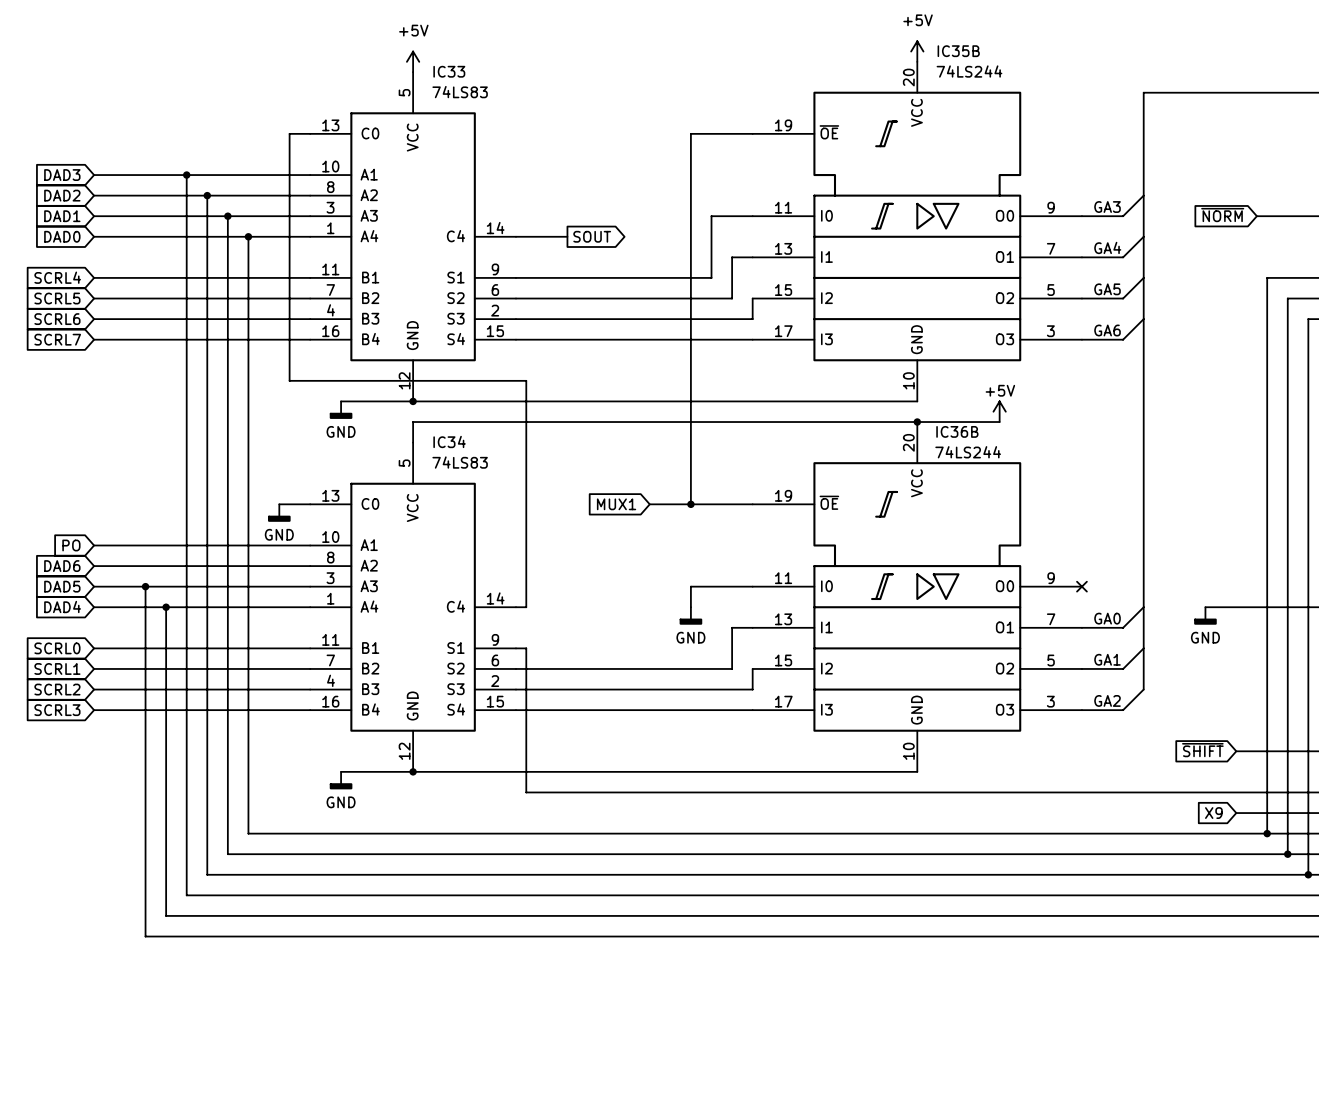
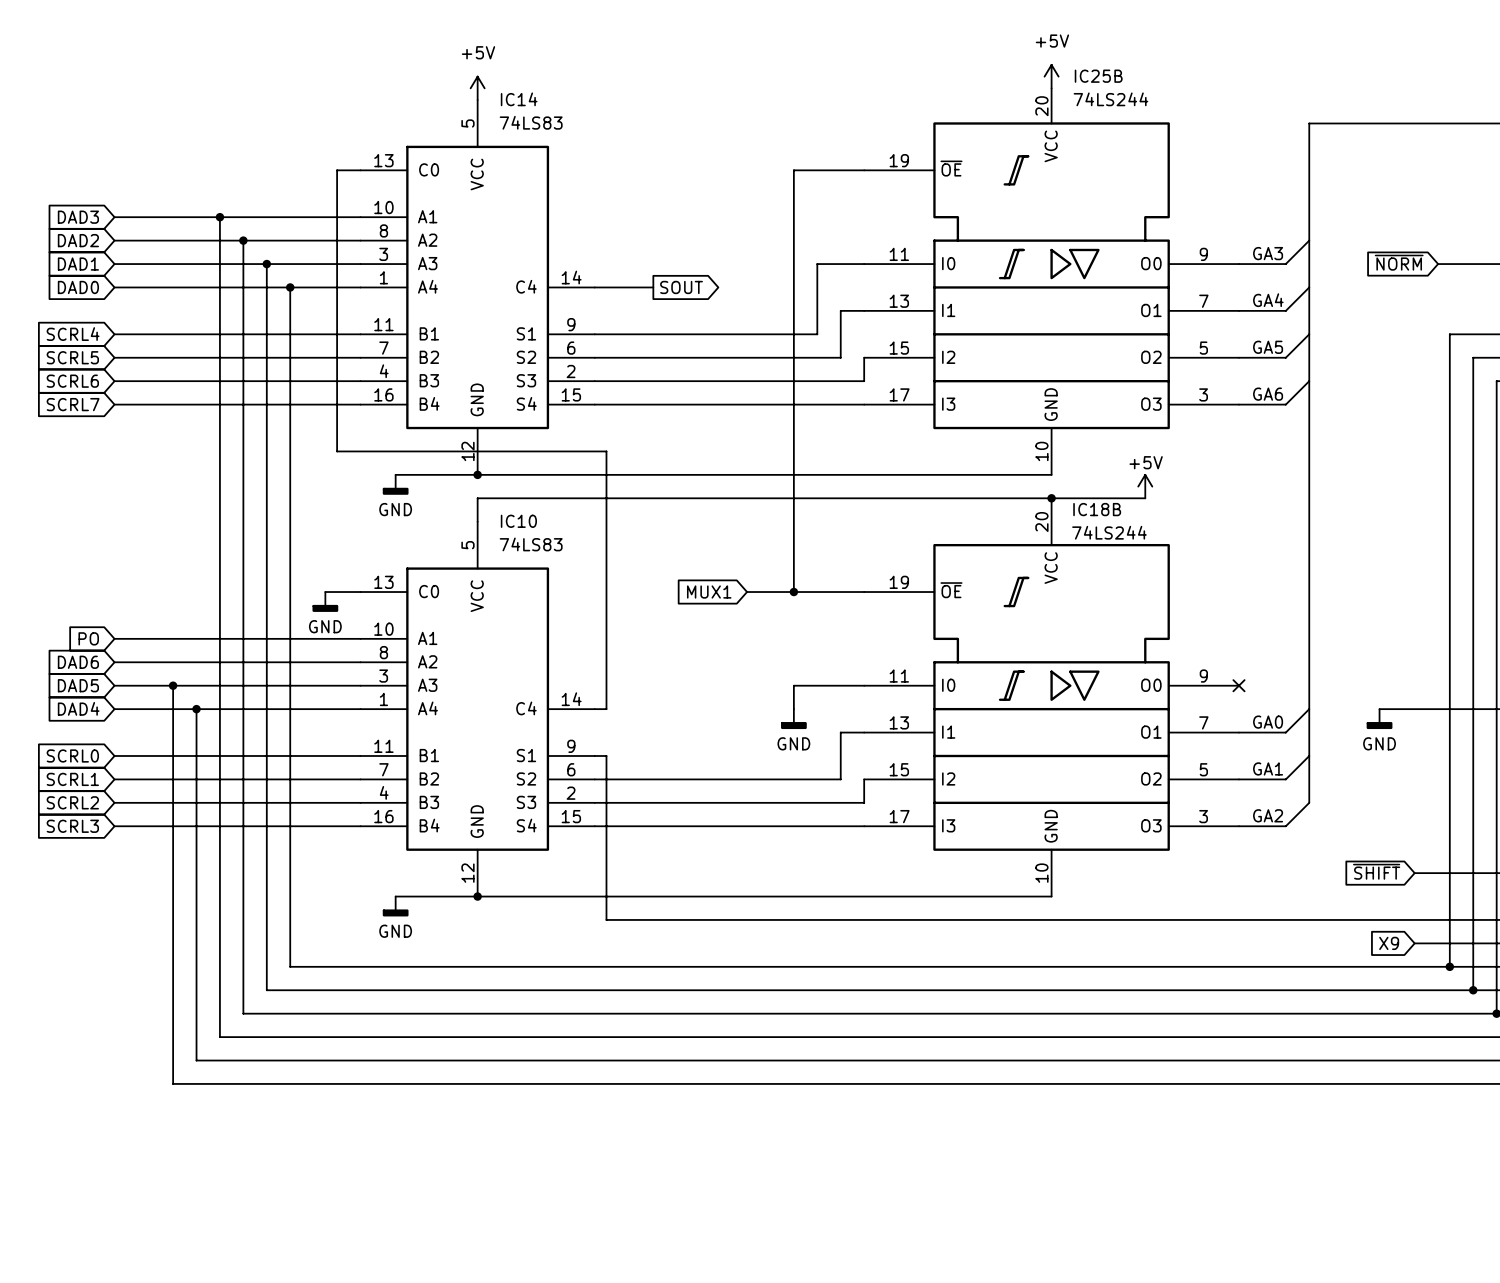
IC35B name: IC35B (958, 51) -> IC25B (1098, 76)
IC33 name: IC33 (449, 71) -> IC14 (519, 99)
IC36B name: IC36B (957, 431) -> IC18B (1097, 509)
IC34 name: IC34 (449, 441) -> IC10 (518, 521)

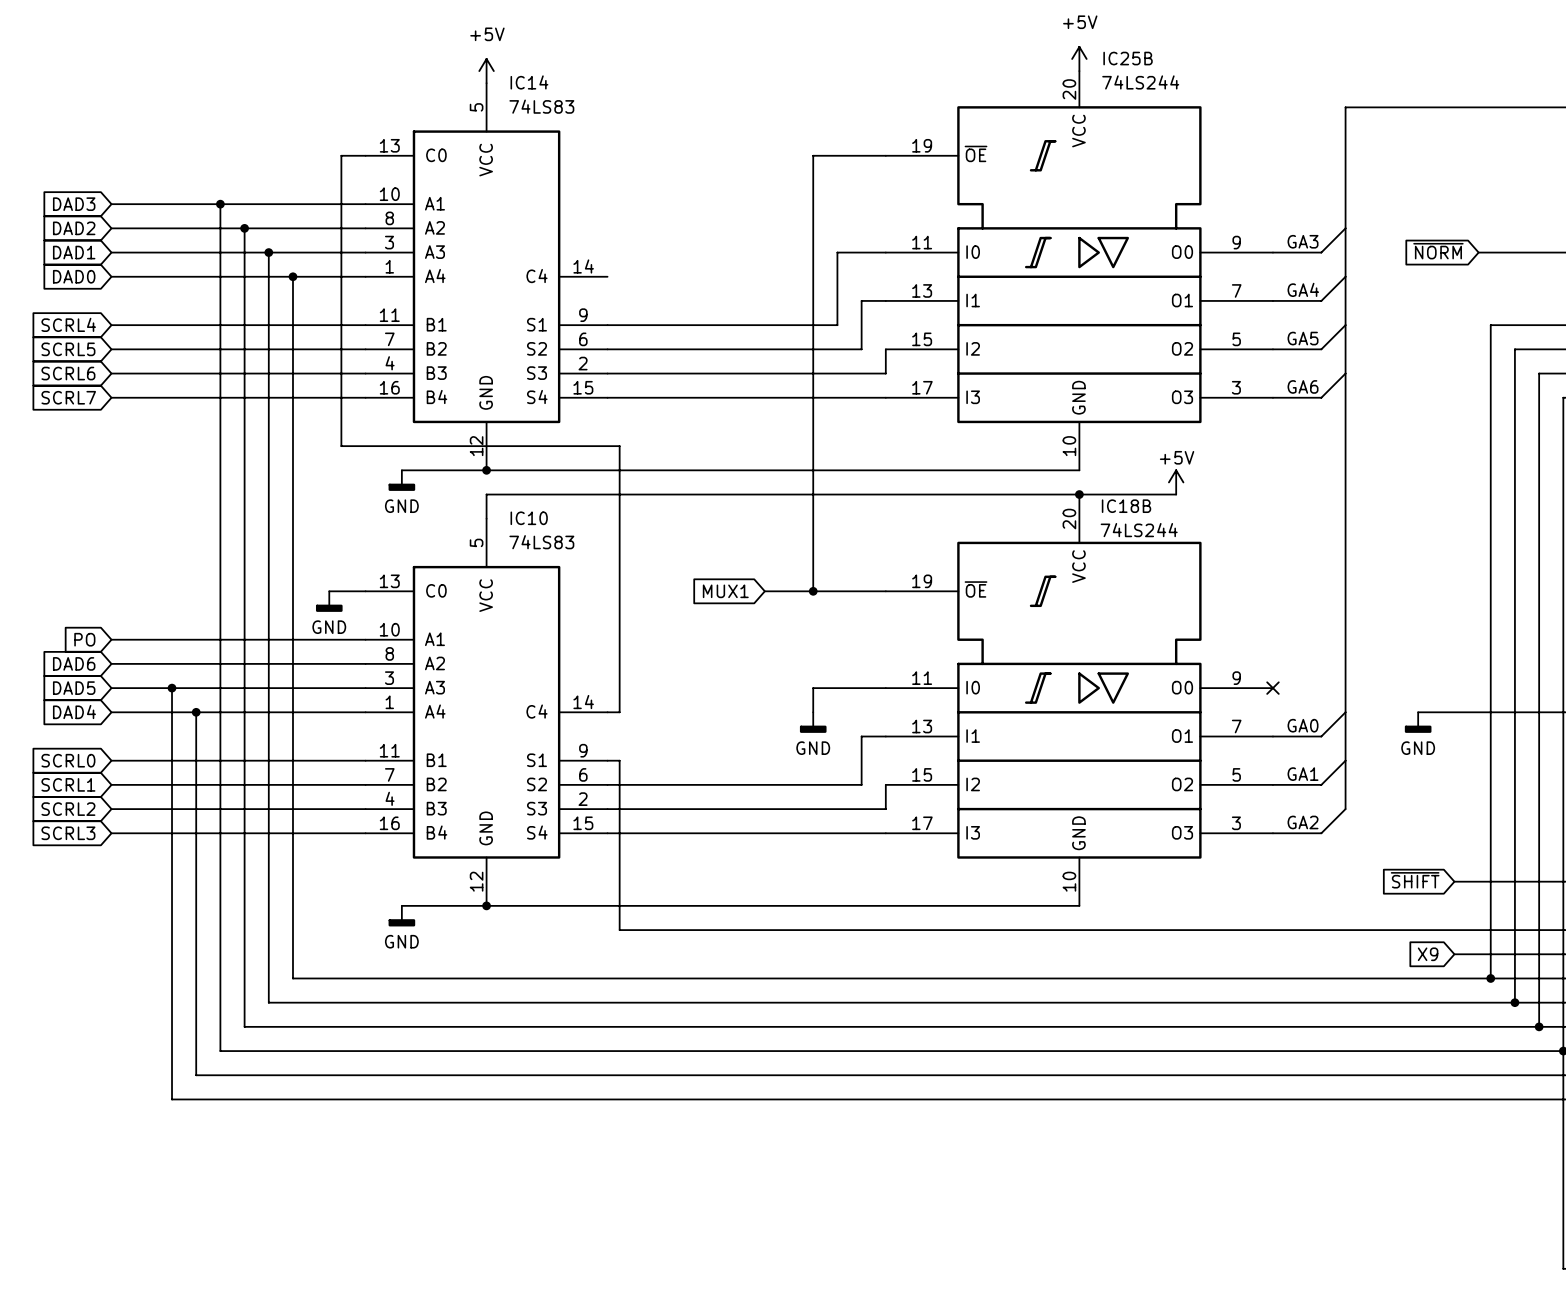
wire: (594, 287) (653, 287) -> none
global label: SOUT (681, 287) -> none

